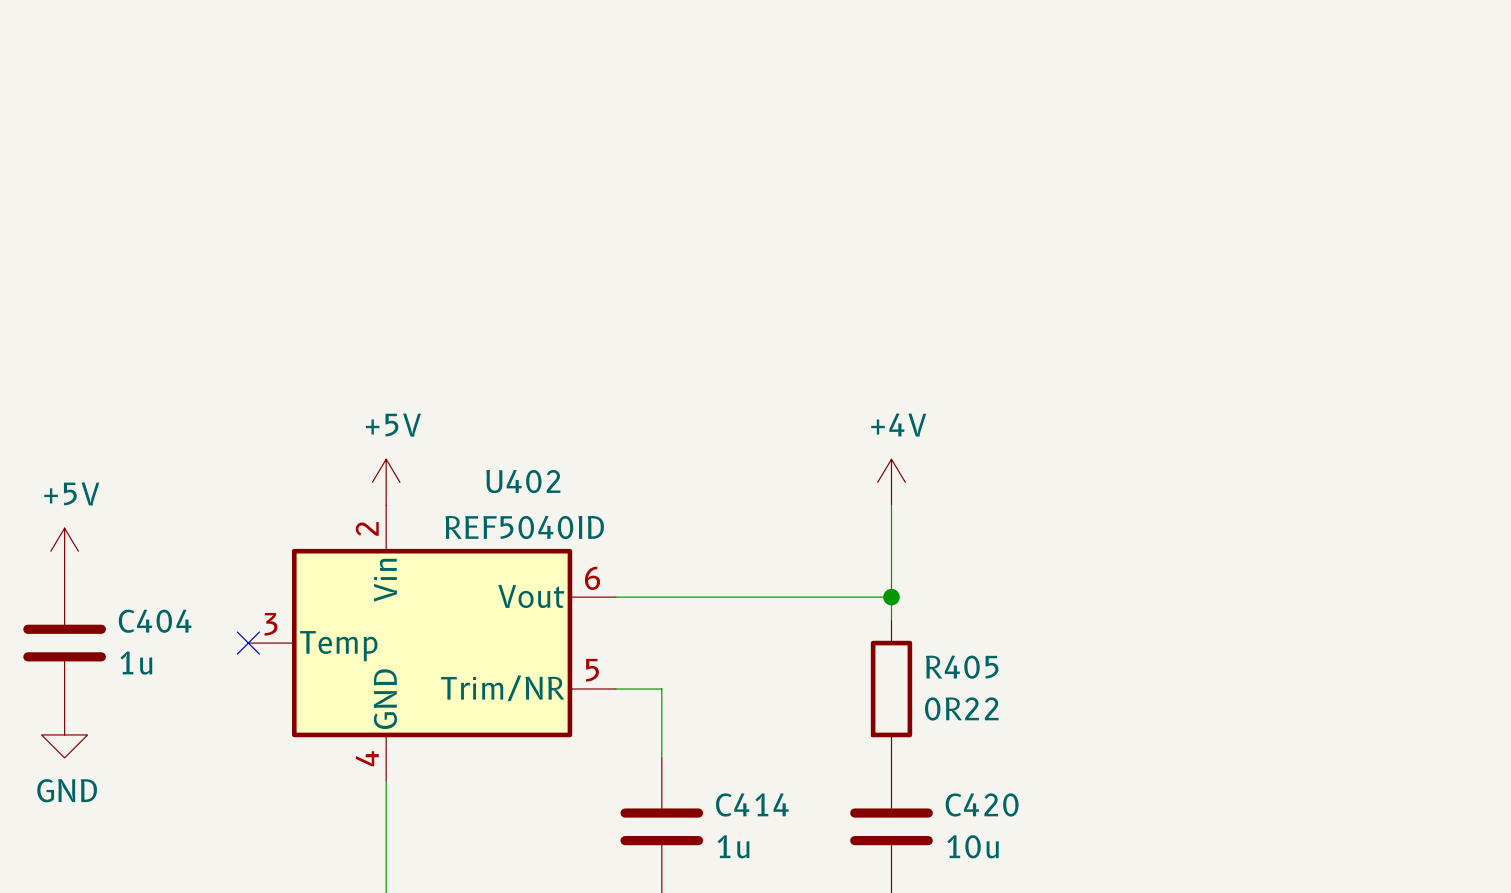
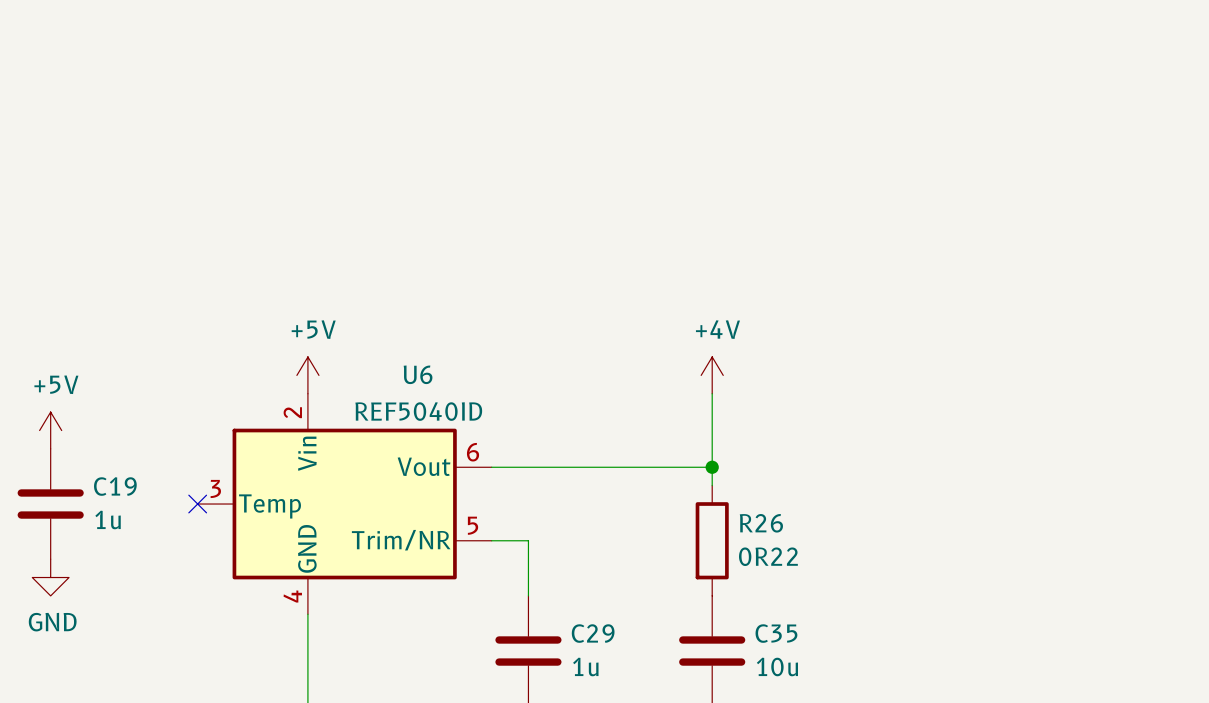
U402 name: U402 (523, 481) -> U6 (418, 374)
C404 name: C404 (155, 621) -> C19 (115, 486)
R405 name: R405 (962, 667) -> R26 (761, 523)
C414 name: C414 (752, 804) -> C29 (593, 633)
C420 name: C420 (982, 804) -> C35 (776, 633)

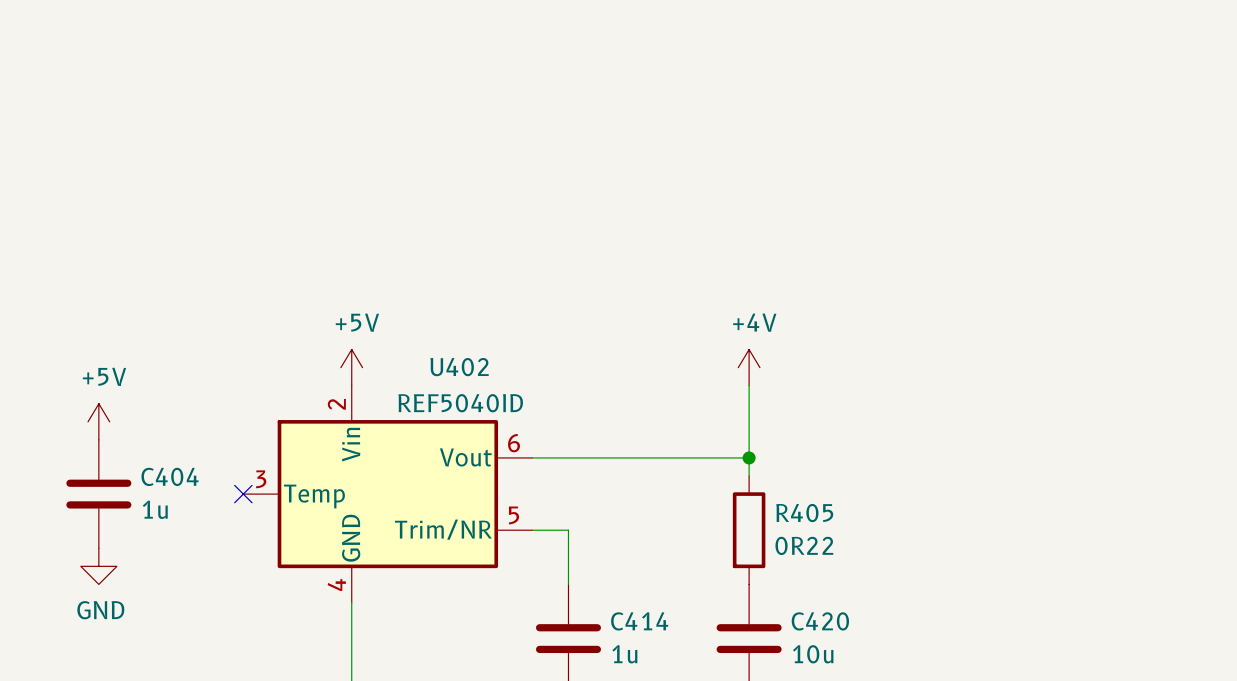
U6 name: U6 (418, 374) -> U402 (459, 367)
C19 name: C19 (115, 486) -> C404 (170, 476)
R26 name: R26 (761, 523) -> R405 (804, 513)
C29 name: C29 (593, 633) -> C414 (639, 621)
C35 name: C35 (776, 633) -> C420 (820, 621)

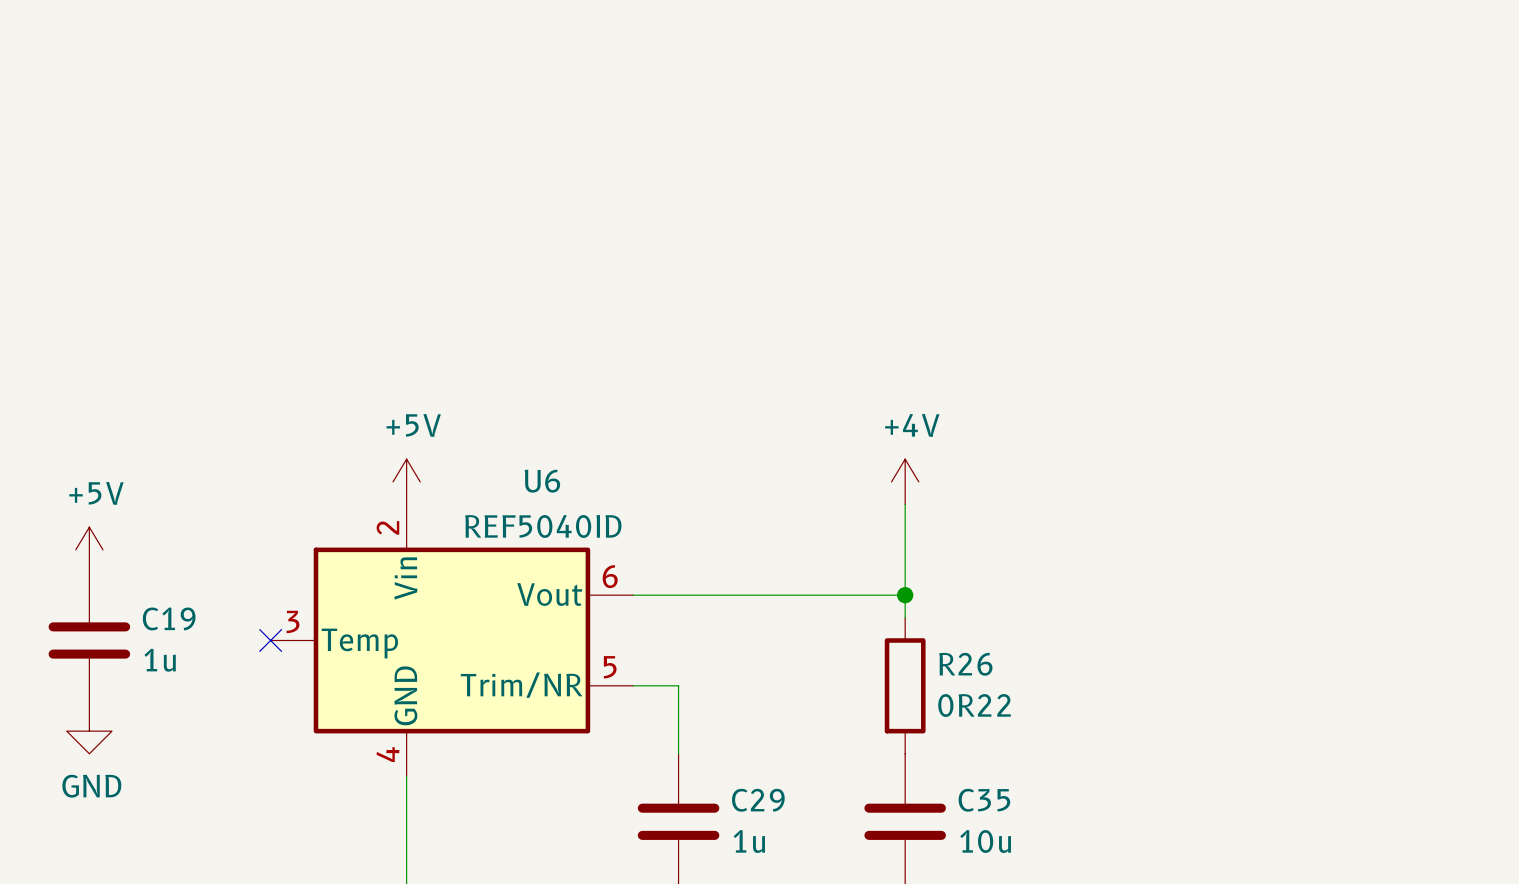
U402 name: U402 (459, 367) -> U6 (542, 481)
C404 name: C404 (170, 476) -> C19 (169, 618)
R405 name: R405 (804, 513) -> R26 (965, 664)
C414 name: C414 (639, 621) -> C29 (758, 800)
C420 name: C420 (820, 621) -> C35 (984, 800)

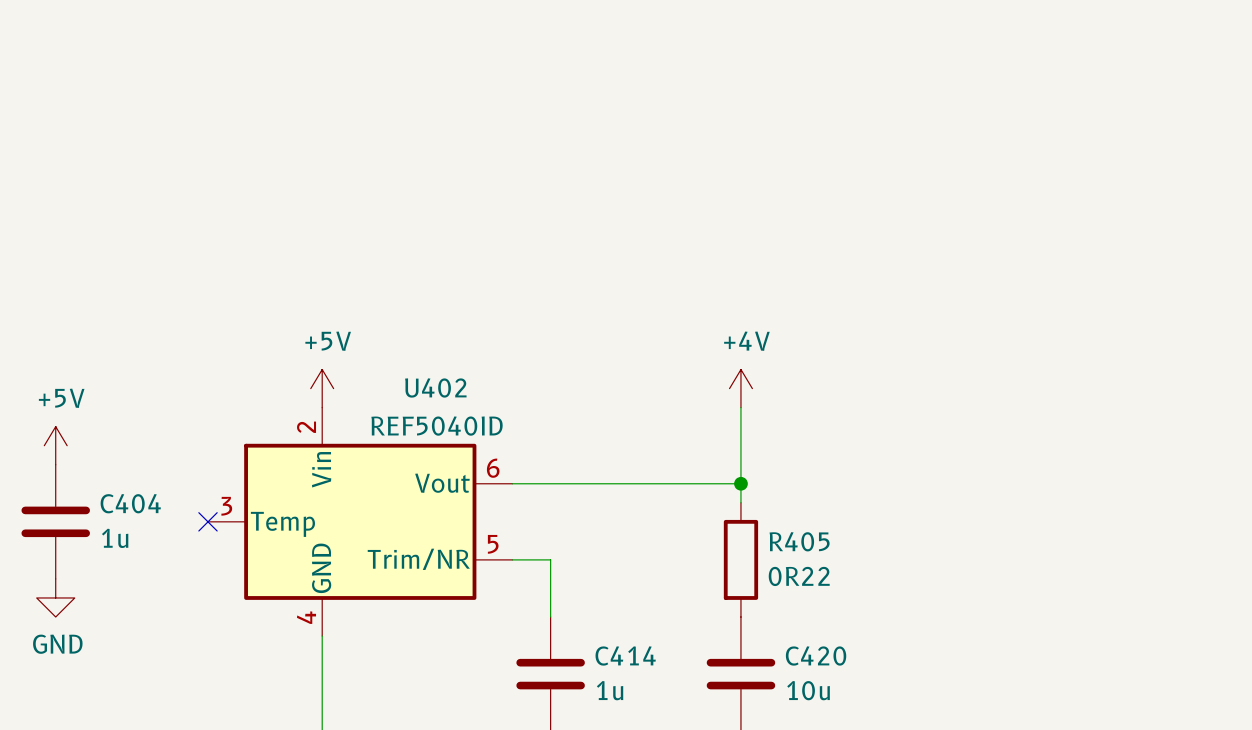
U6 name: U6 (542, 481) -> U402 (435, 387)
C19 name: C19 (169, 618) -> C404 (130, 503)
R26 name: R26 (965, 664) -> R405 (799, 541)
C29 name: C29 (758, 800) -> C414 (625, 656)
C35 name: C35 (984, 800) -> C420 (816, 656)

